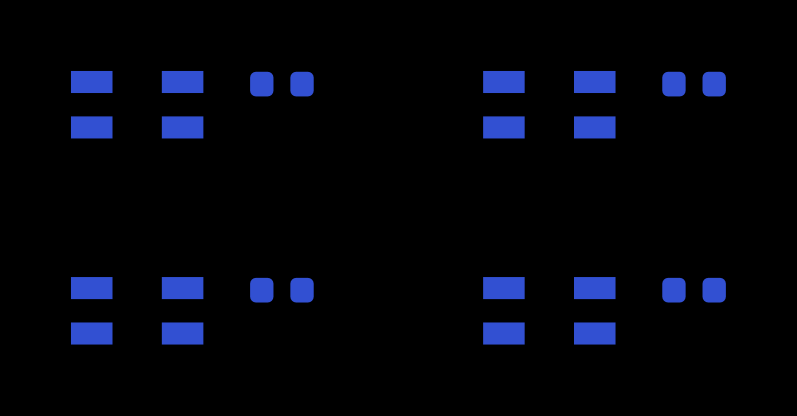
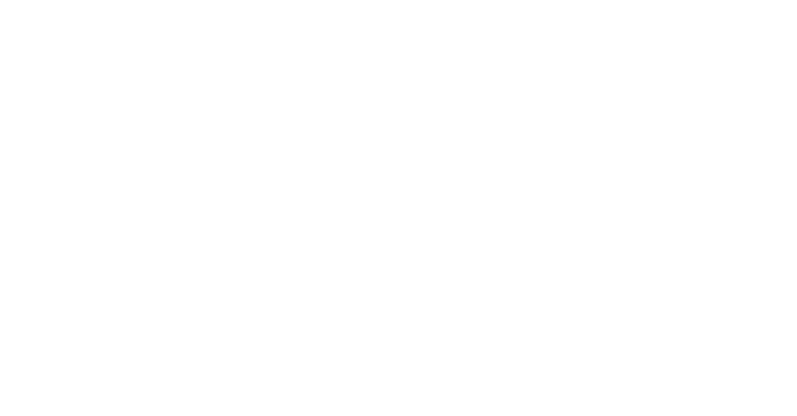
part: (281, 84) -> none
part: (694, 84) -> none
part: (137, 104) -> none
part: (549, 104) -> none
part: (281, 290) -> none
part: (694, 290) -> none
part: (137, 310) -> none
part: (549, 310) -> none

